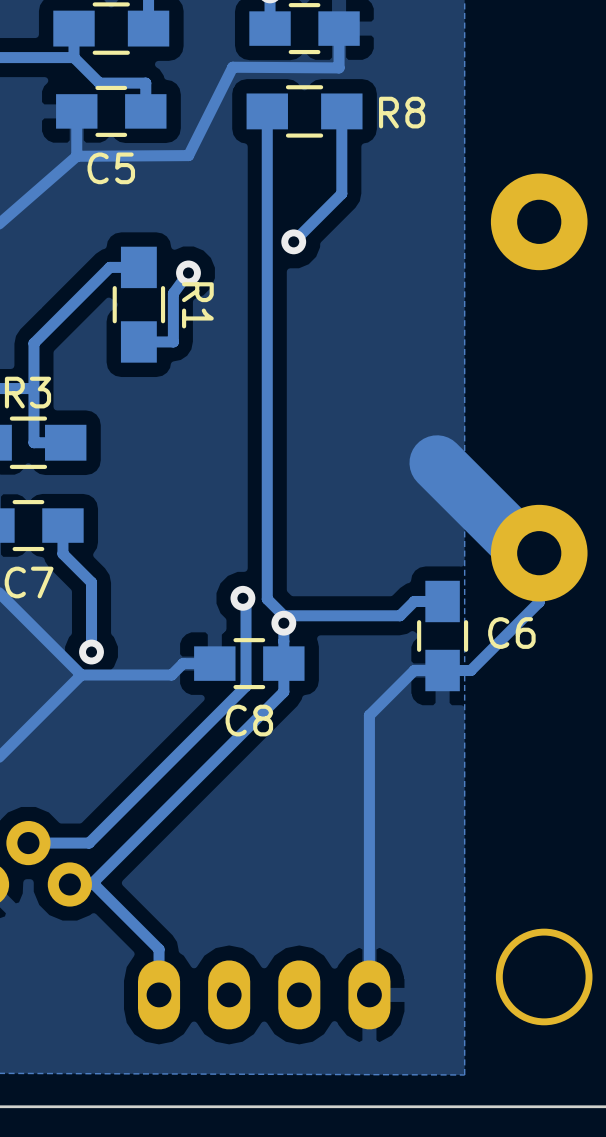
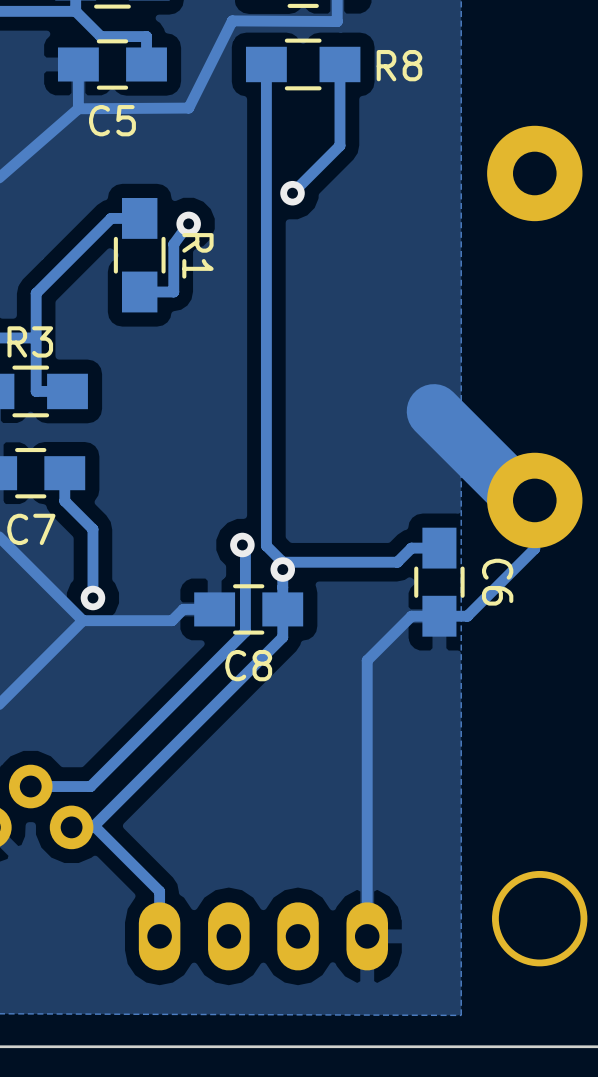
C6 name rotation: 0° (511, 633) -> 90° clockwise (497, 582)

